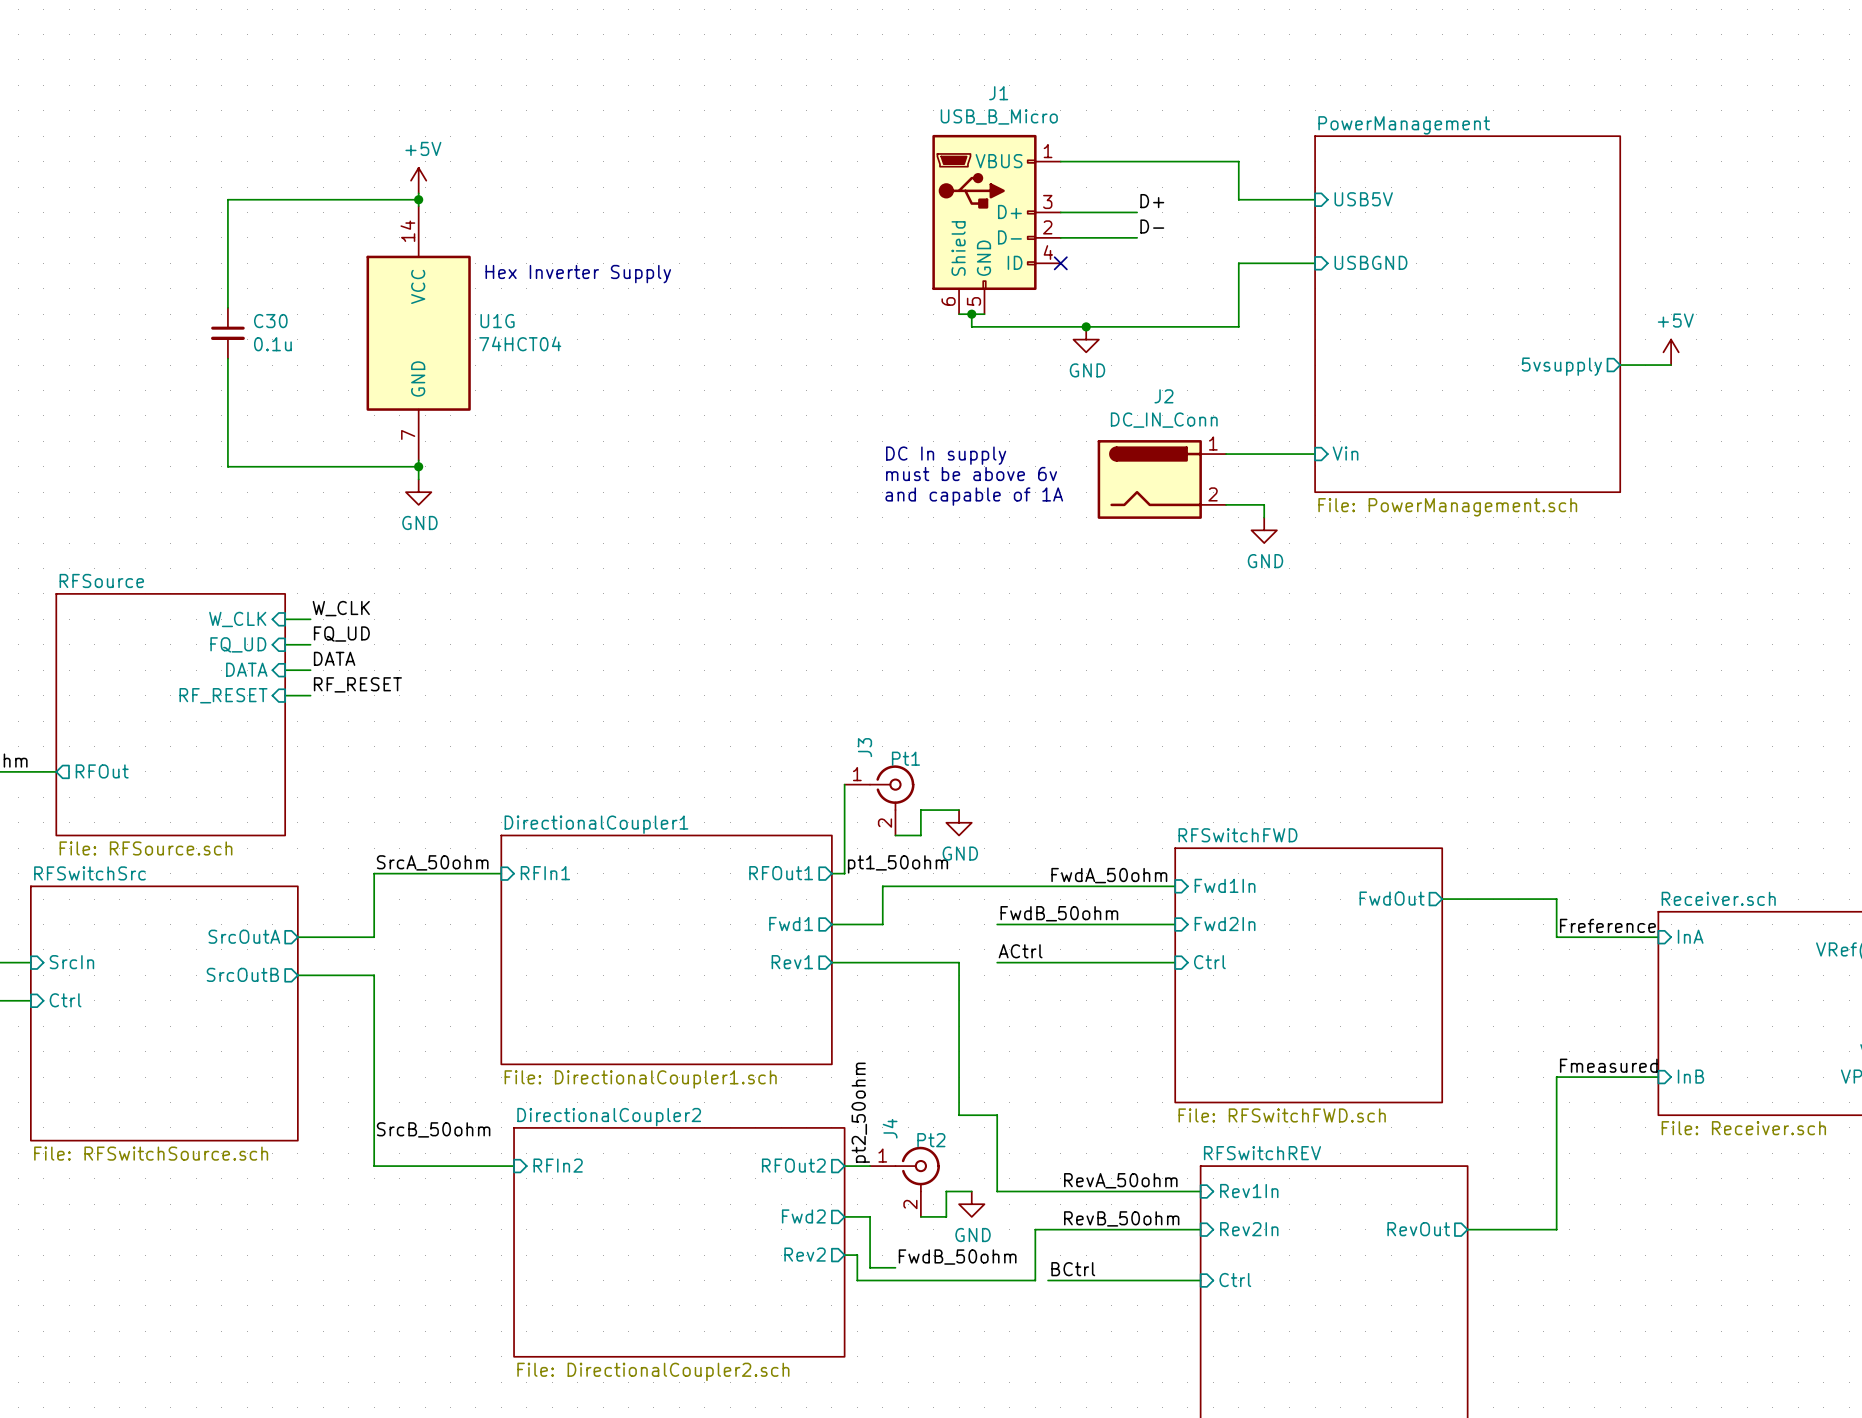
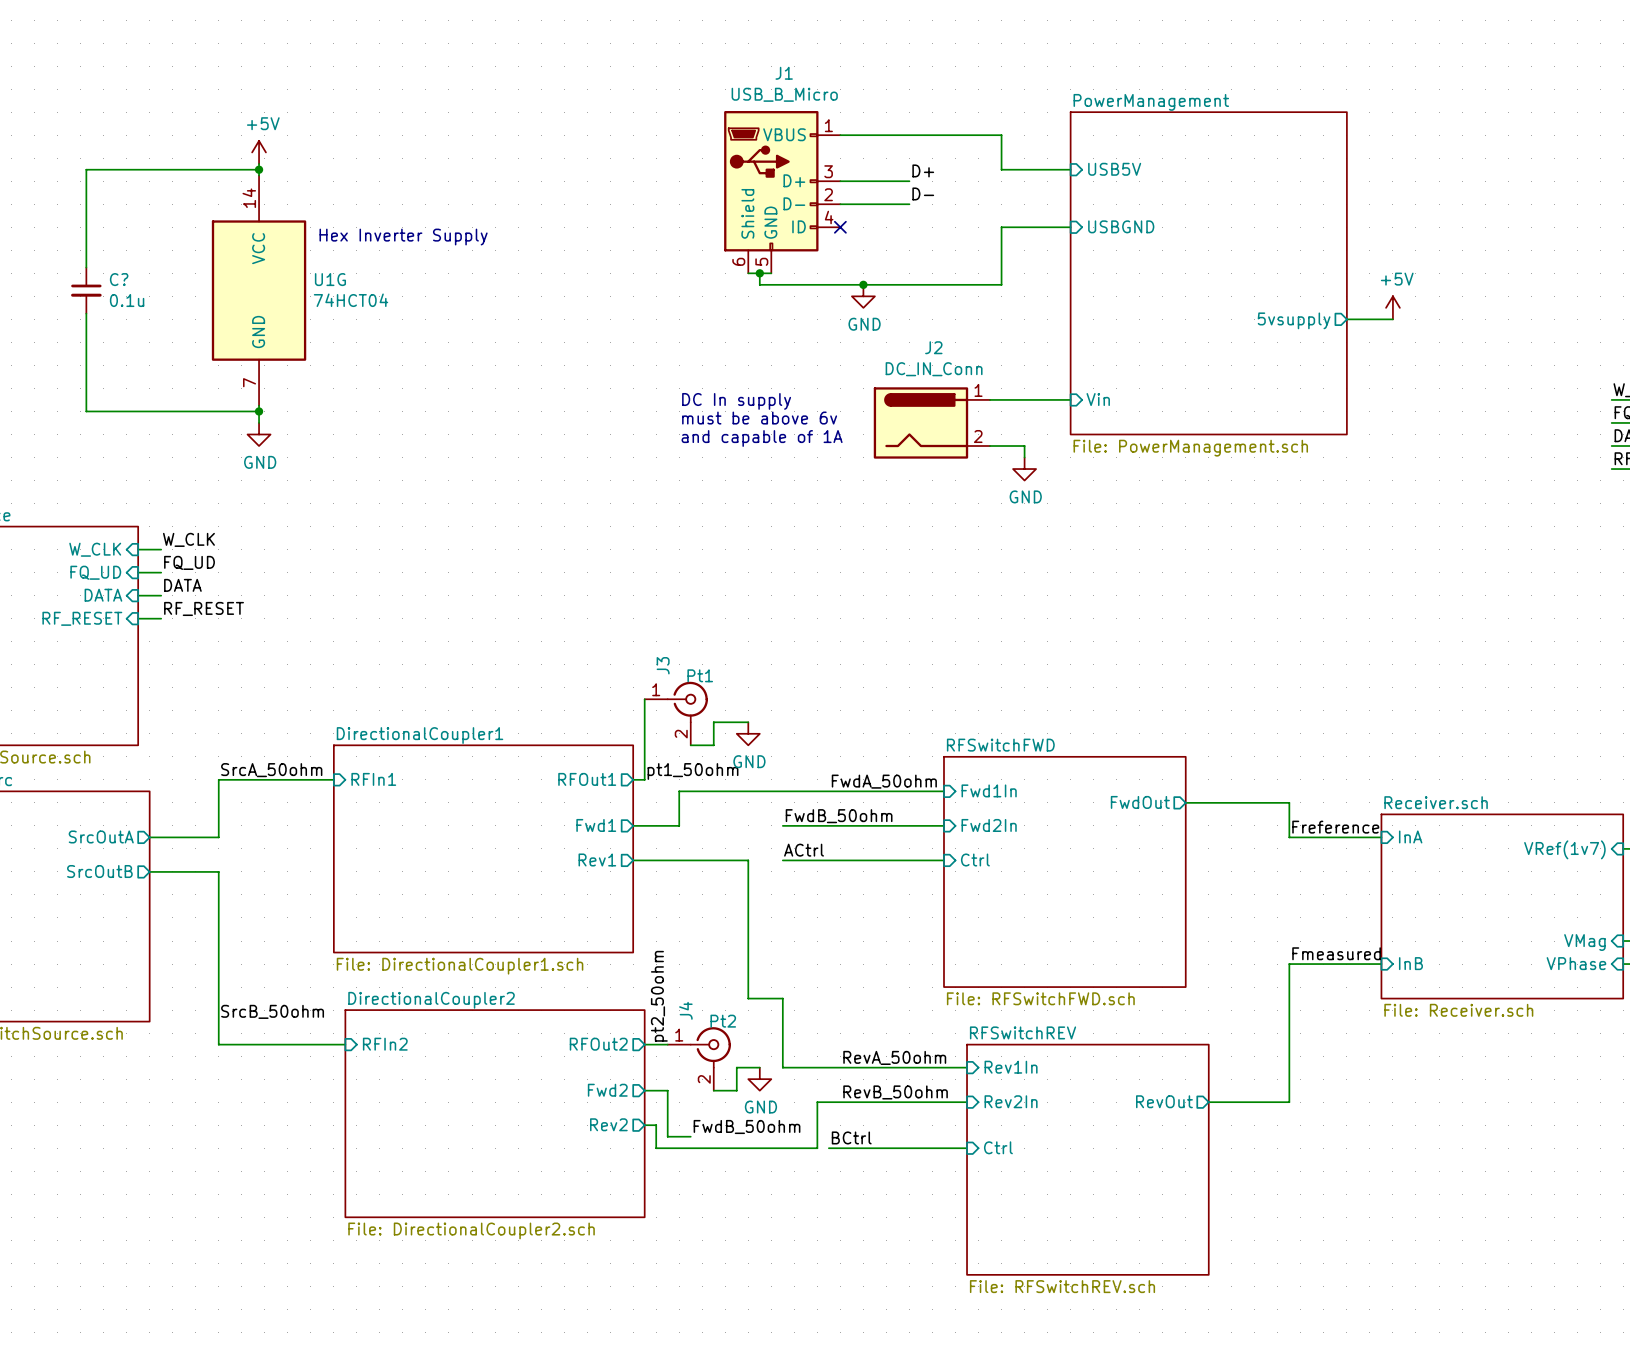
C30 name: C30 (270, 321) -> C? (119, 279)

